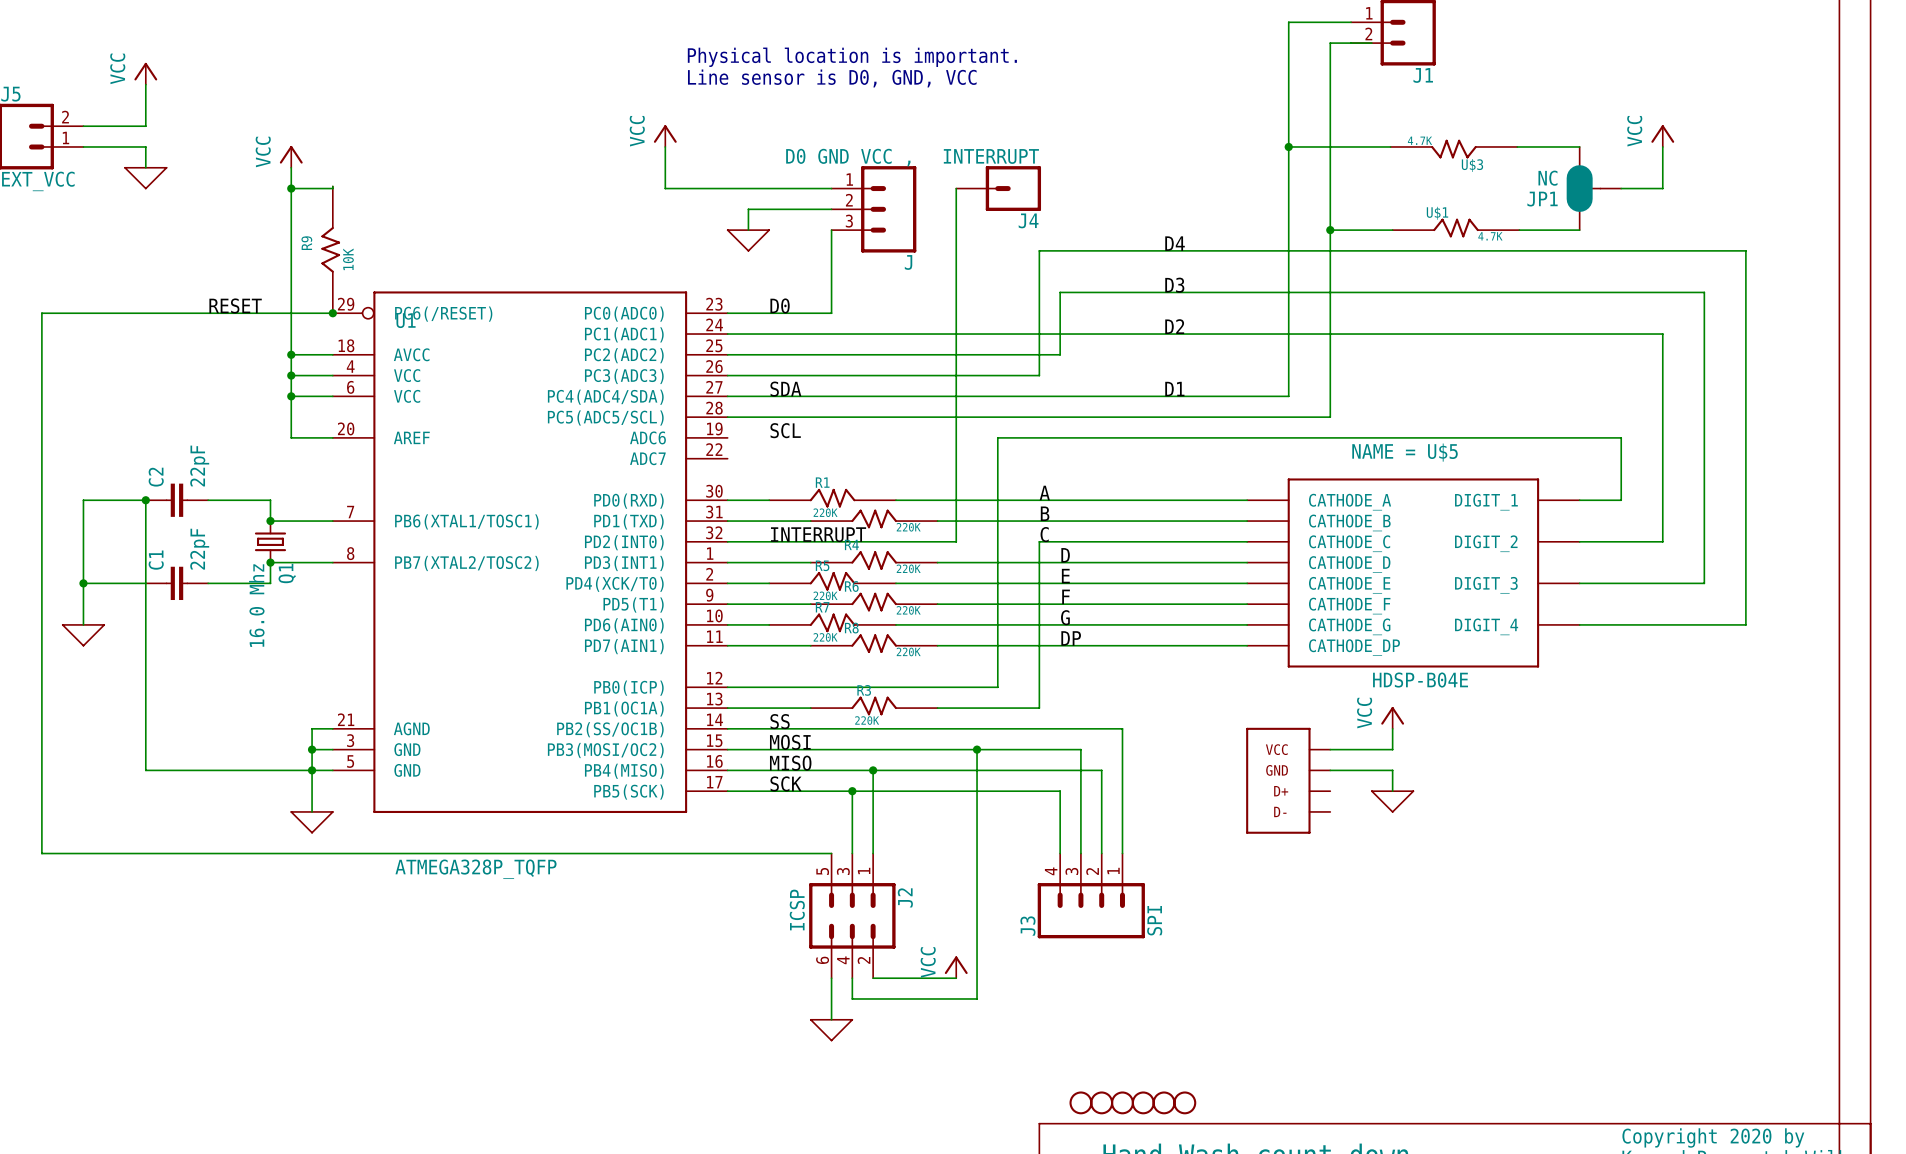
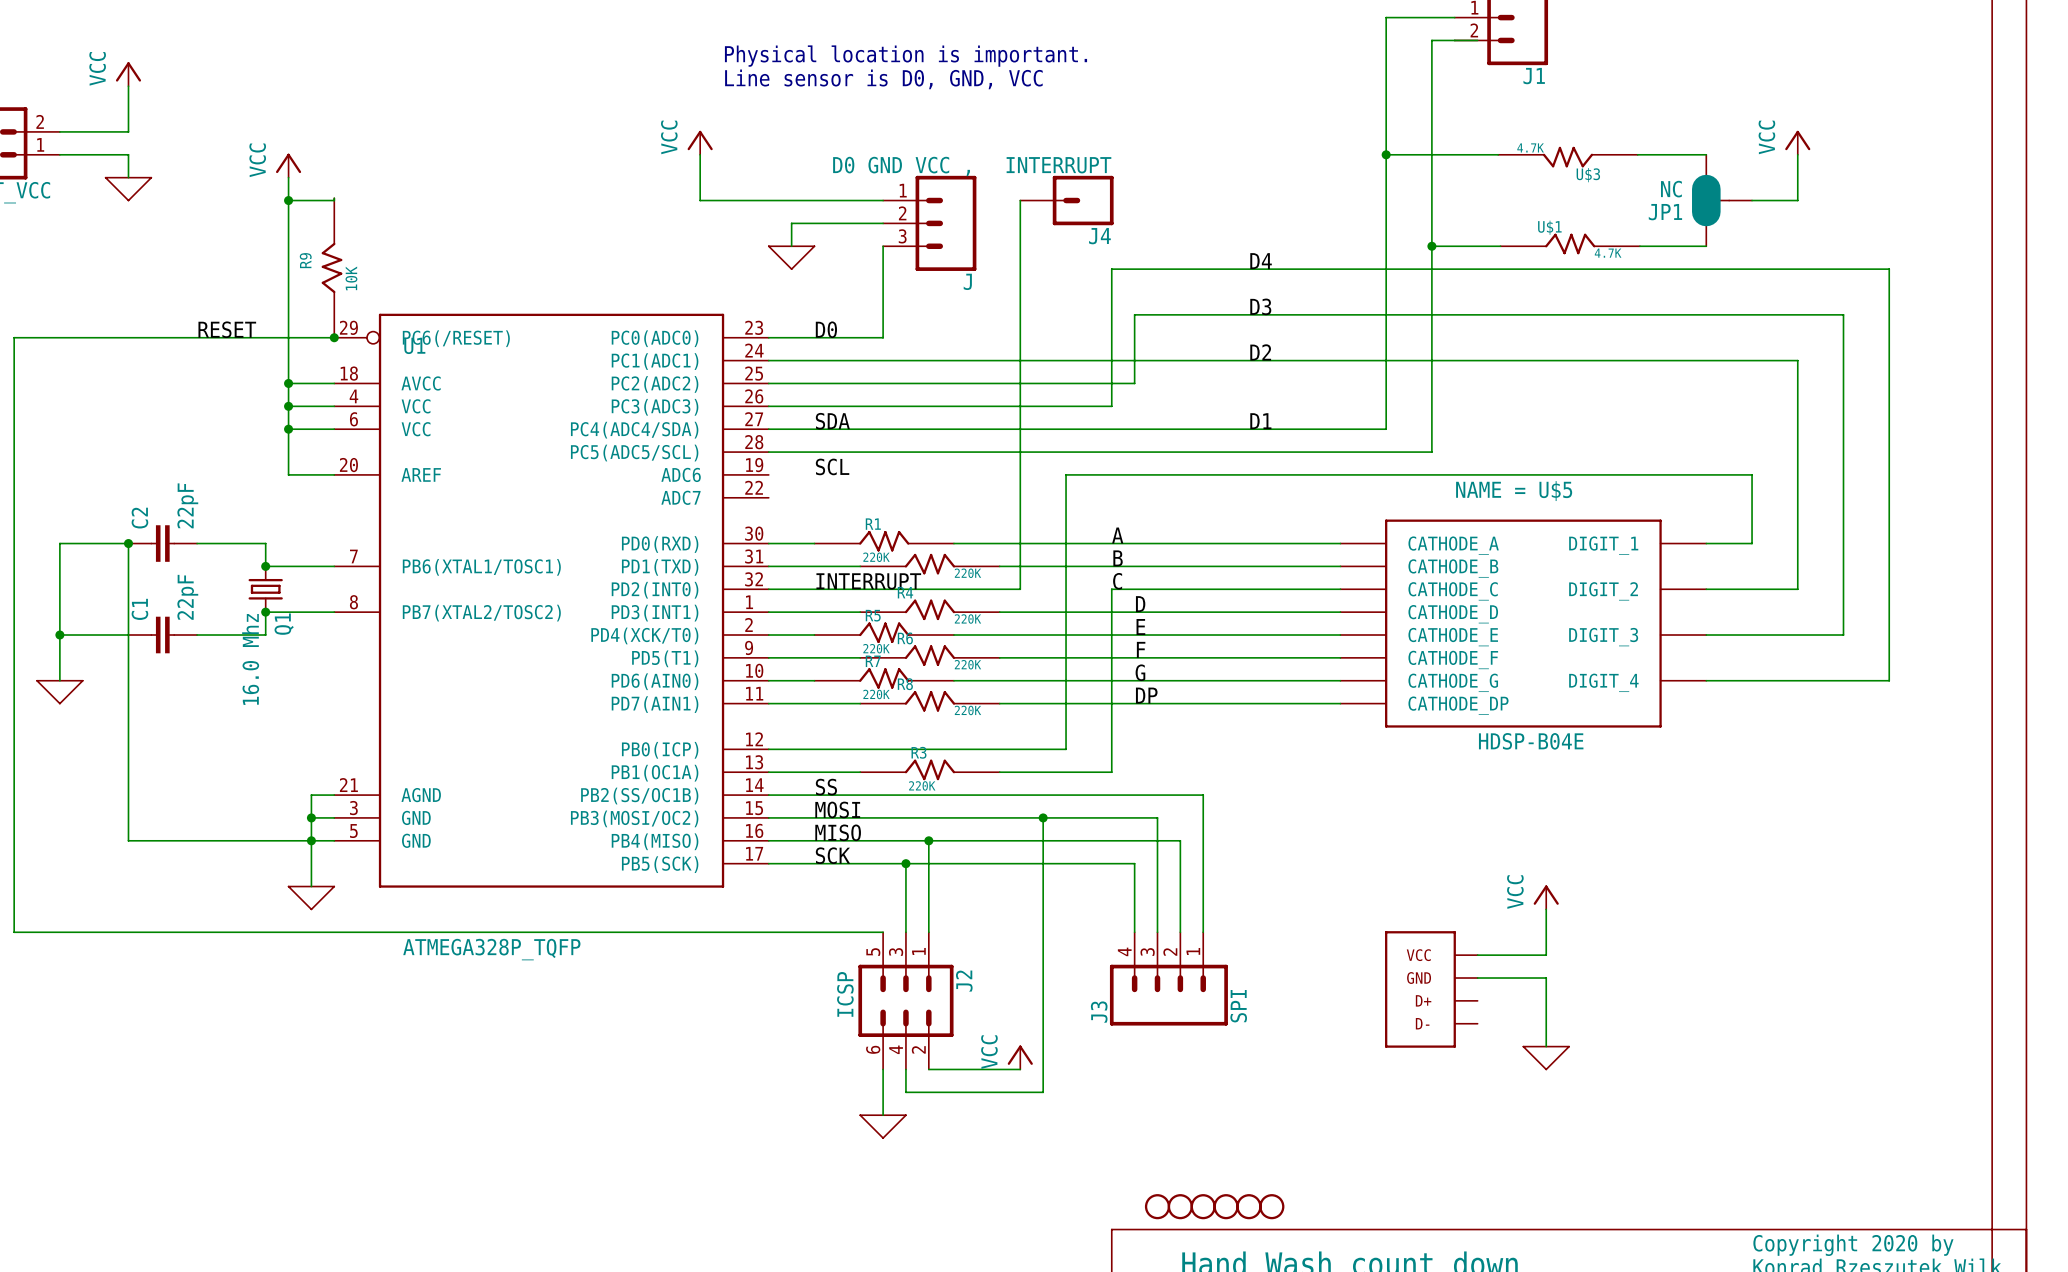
power symbol position: VCC (1392, 717) -> VCC (1546, 897)
wire: (1392, 728) (1392, 749) (1330, 749) -> none
wire: (1330, 770) (1392, 770) (1392, 791) -> none
part position: (1288, 780) -> (1431, 989)
power symbol position: (1392, 801) -> (1546, 1058)
wire: none -> (1546, 909) (1546, 955) (1477, 955)
wire: none -> (1477, 978) (1546, 978) (1546, 1046)

